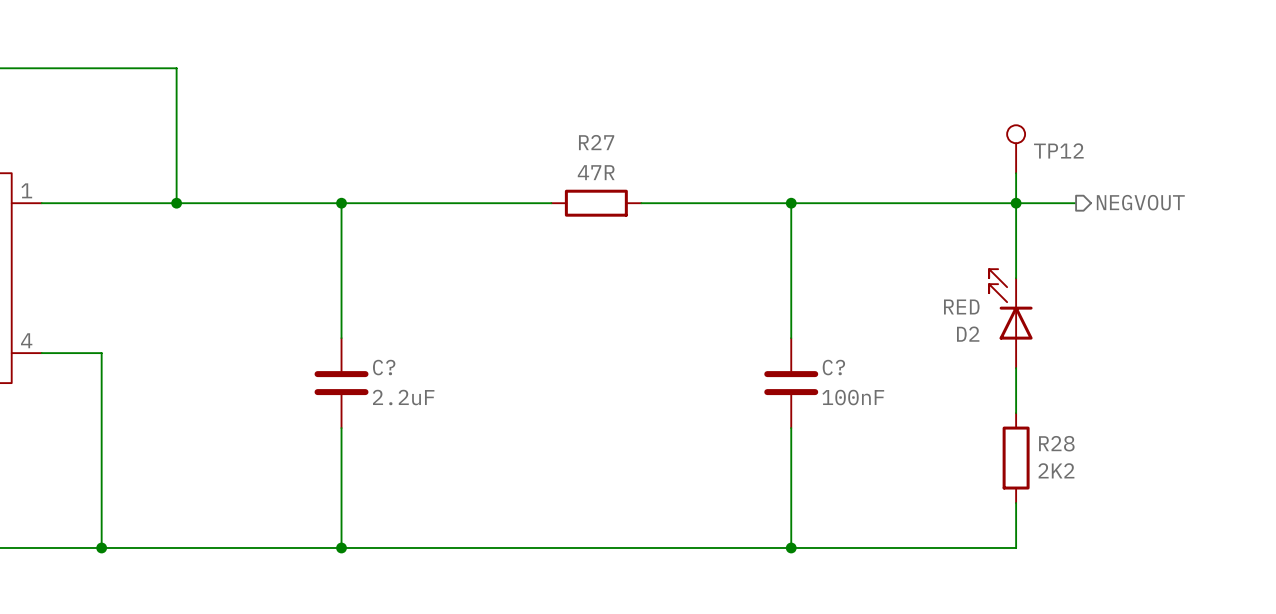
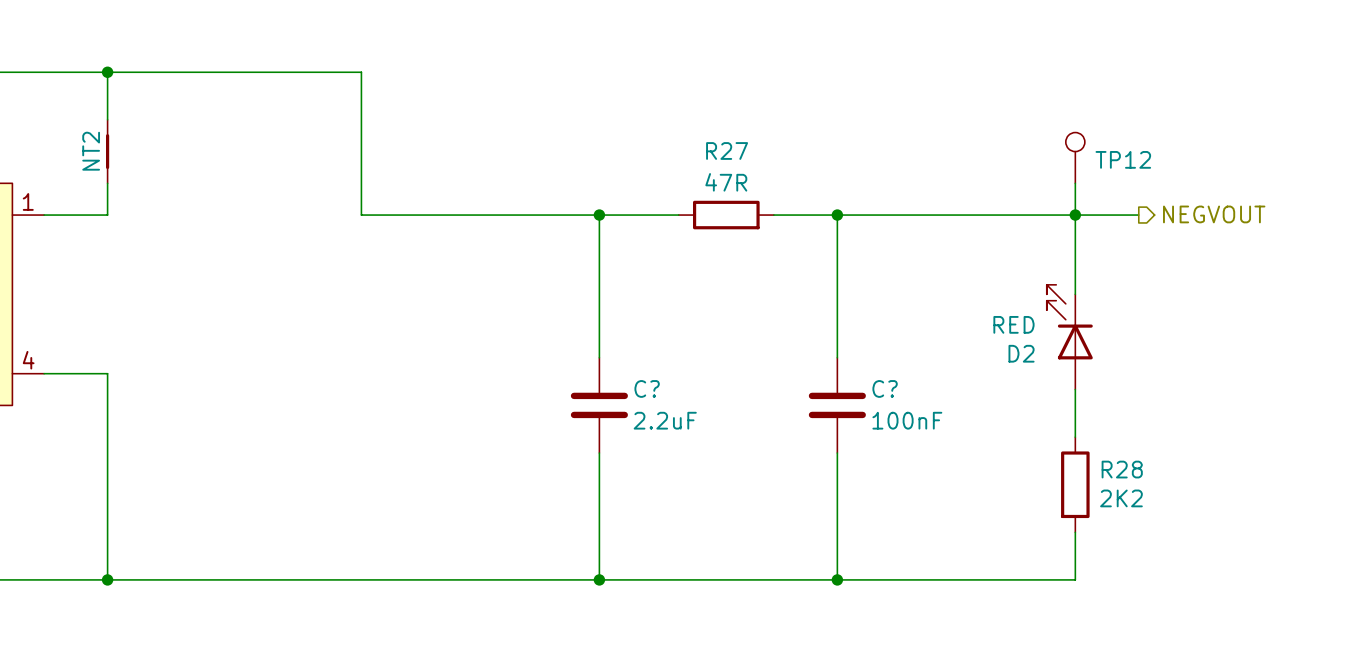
wire: none -> (107, 72) (107, 119)
junction: none -> (107, 72)
wire: (176, 68) (176, 203) -> (186, 72) (361, 72) (361, 215)
NT2: none -> (107, 151)
wire: (101, 203) (341, 203) (341, 338) -> (107, 215) (107, 183)
junction: (176, 203) -> none
junction: (341, 203) -> none
wire: none -> (599, 215) (599, 357)
junction: none -> (599, 215)
R27 position: (596, 203) -> (726, 215)
wire: (641, 203) (731, 203) -> (678, 215) (583, 215)
C? position: (341, 383) -> (599, 405)
wire: (341, 428) (341, 547) -> (599, 453) (599, 579)
junction: (341, 547) -> none
junction: none -> (599, 579)

